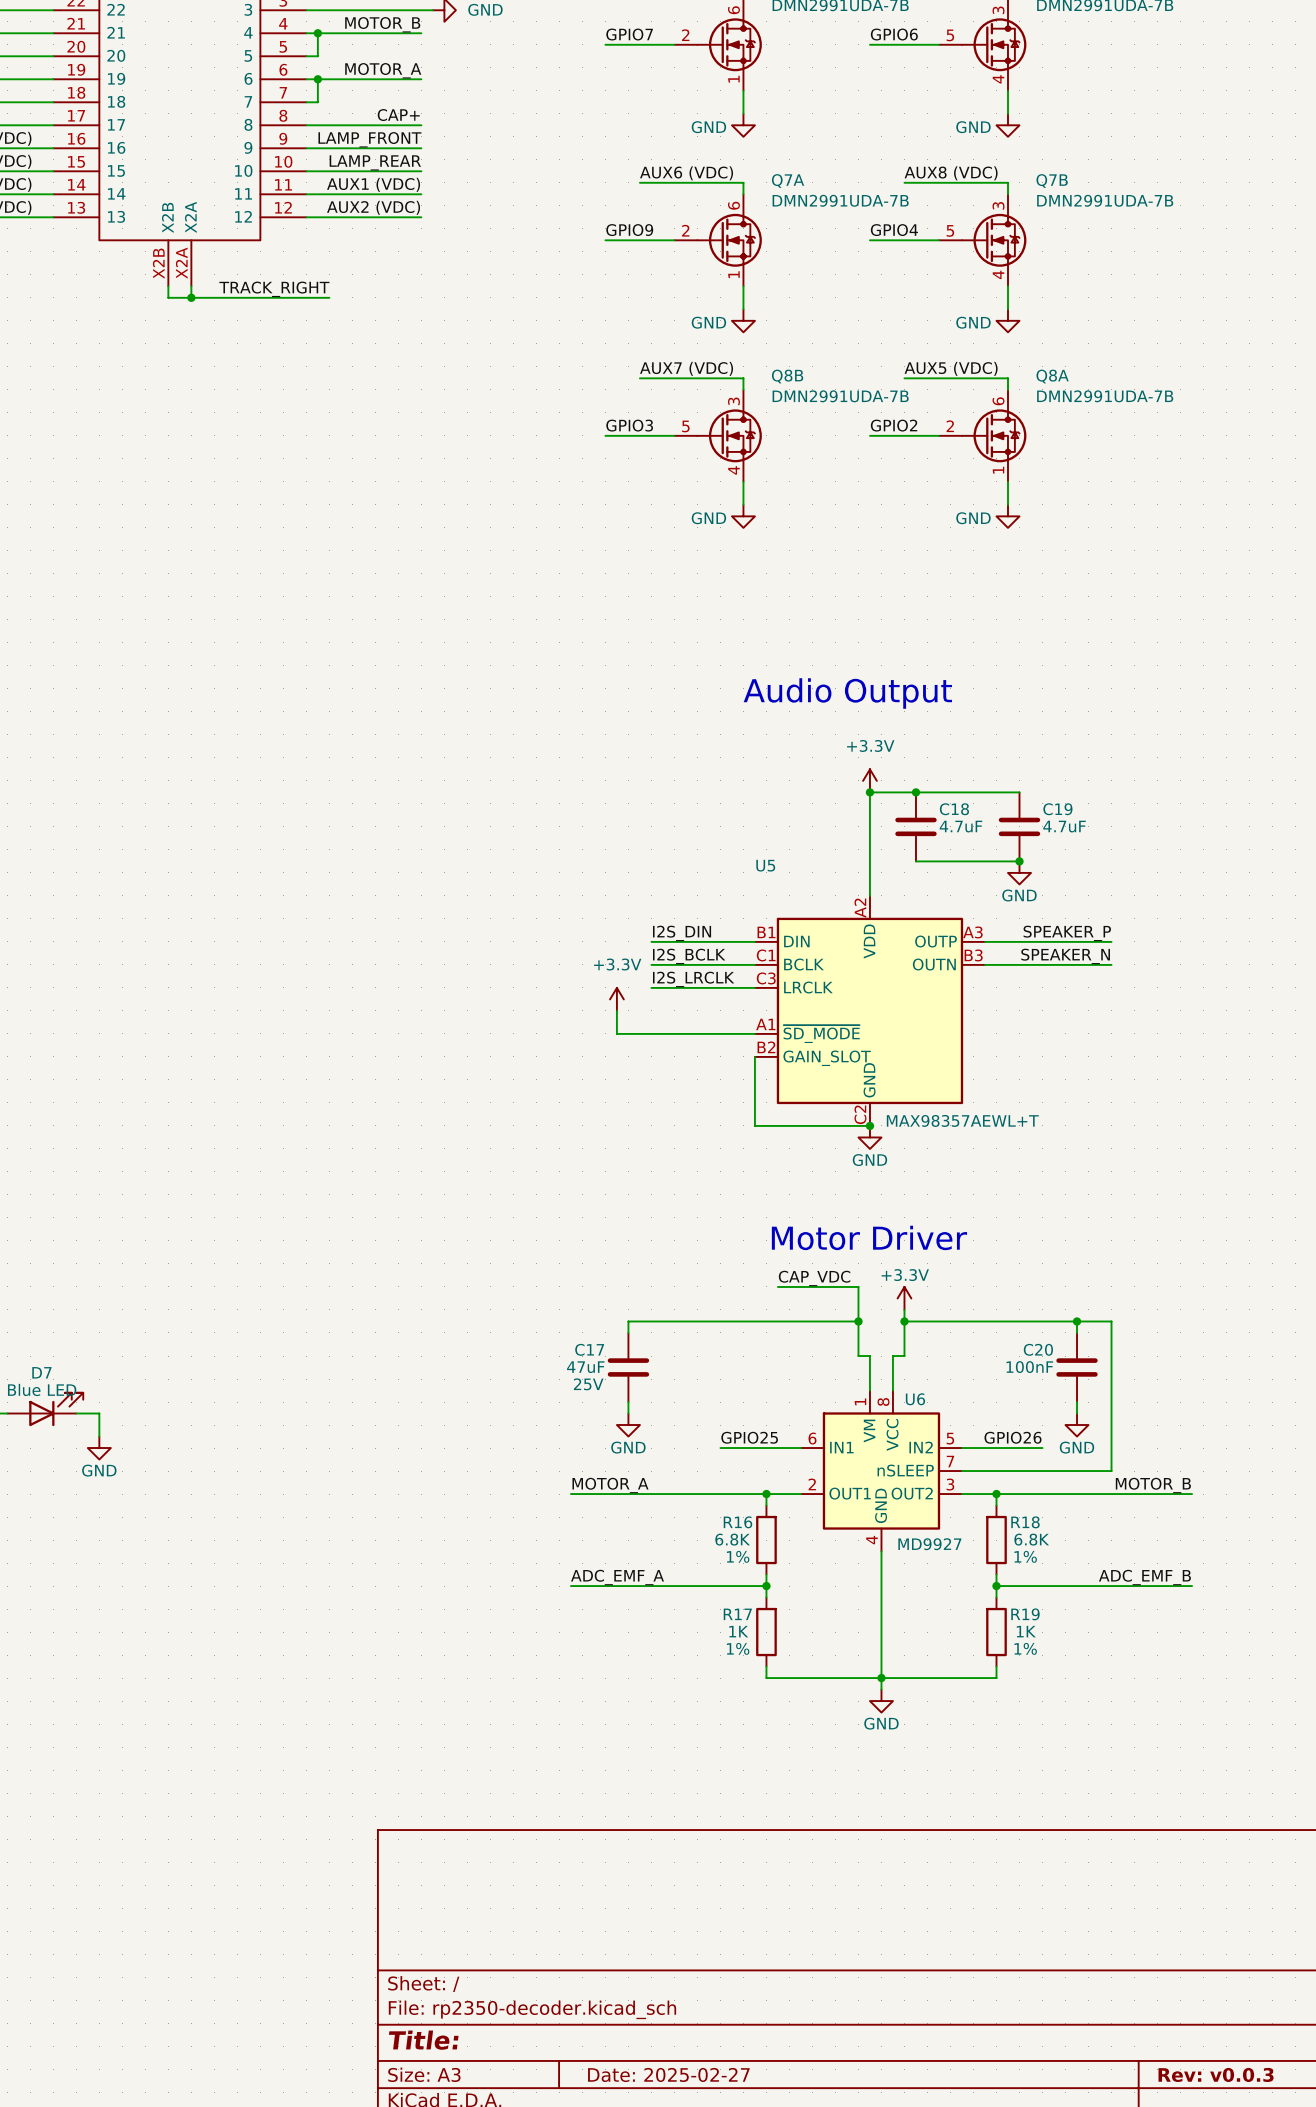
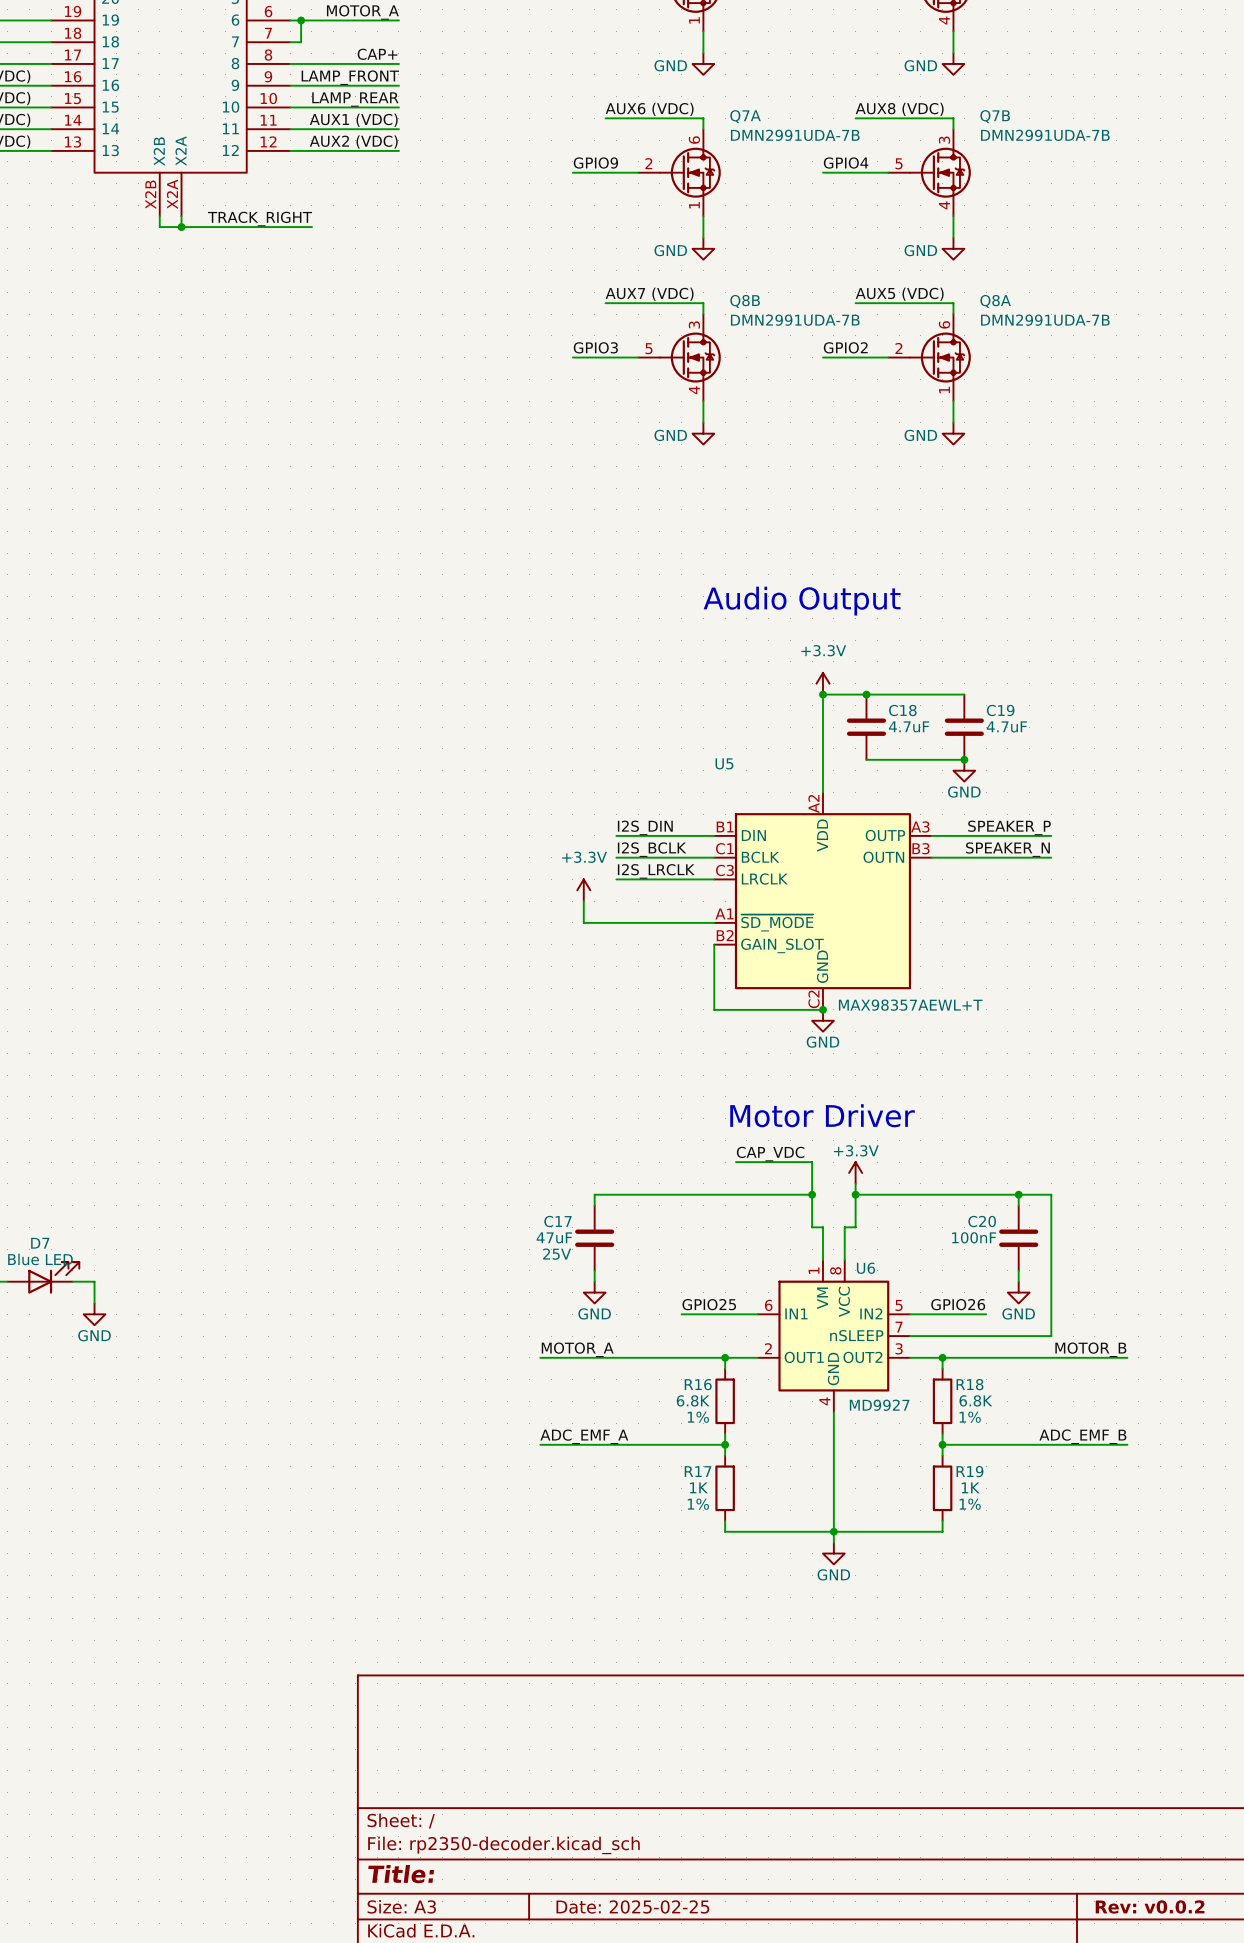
title block: Date: 2025-02-27 (668, 2074) -> Date: 2025-02-25 (632, 1906)
title block: Rev: v0.0.3 (1216, 2074) -> Rev: v0.0.2 (1150, 1906)

